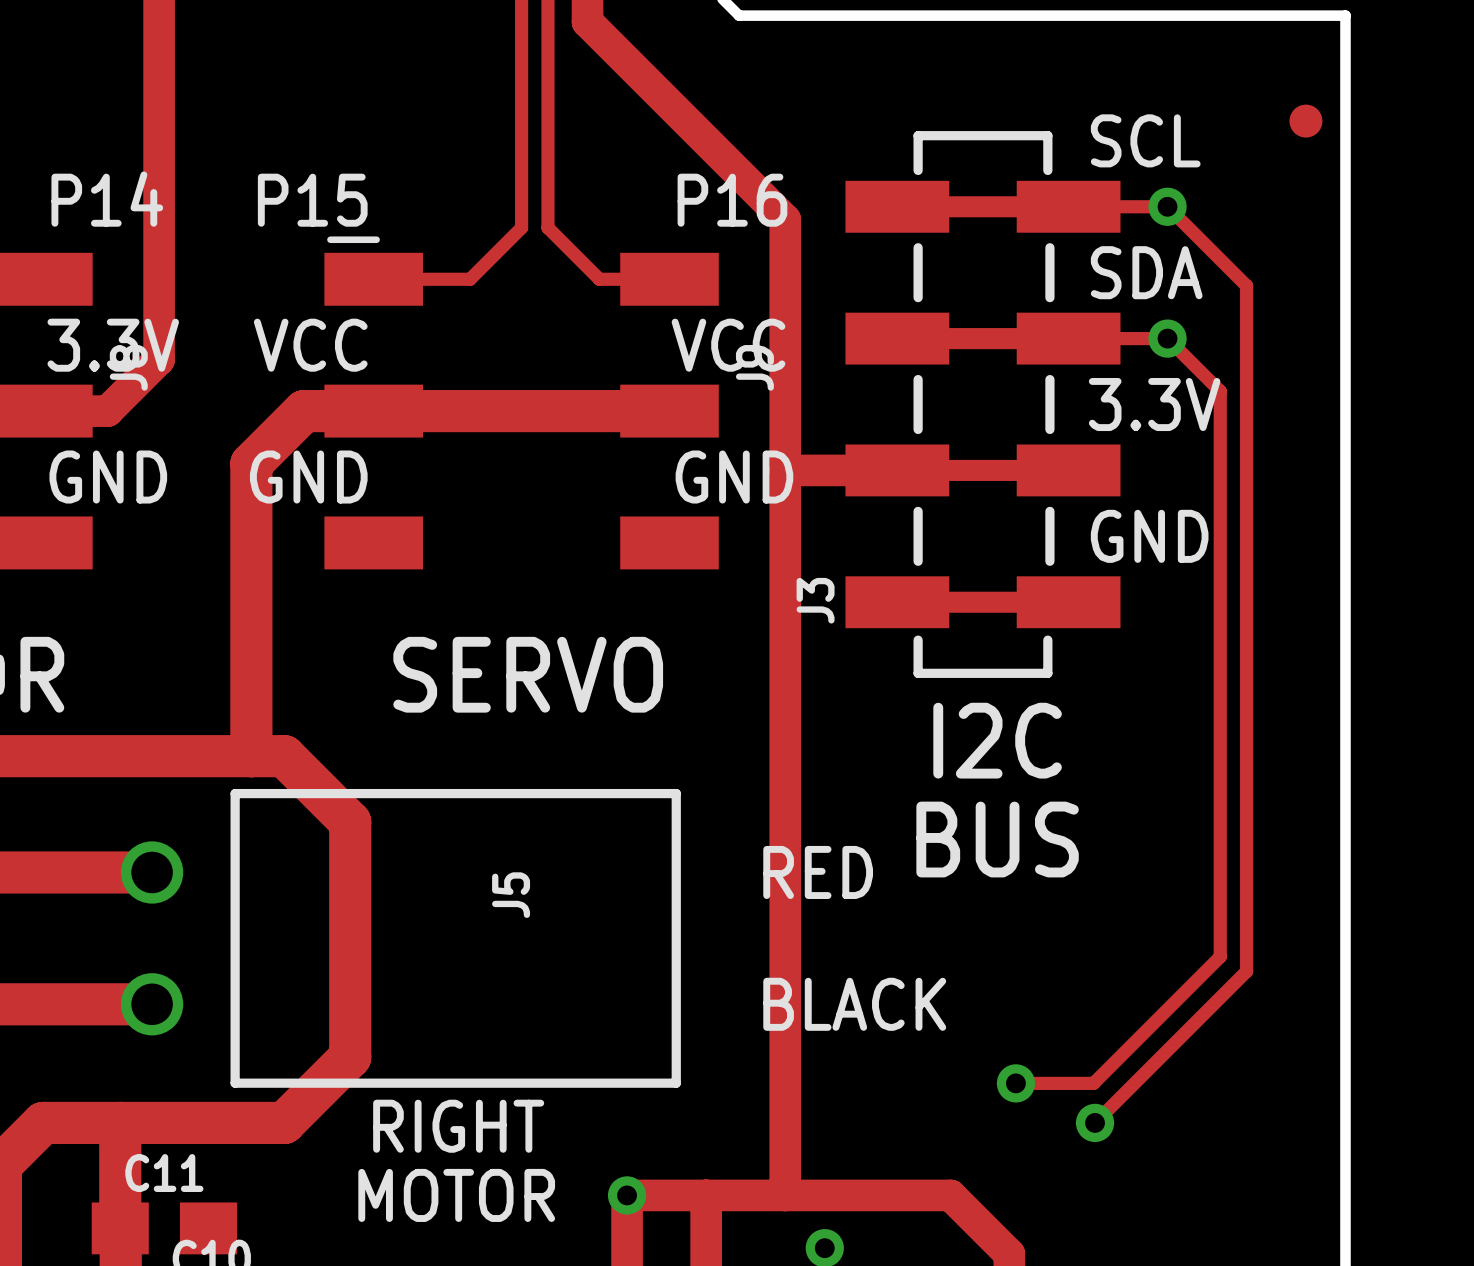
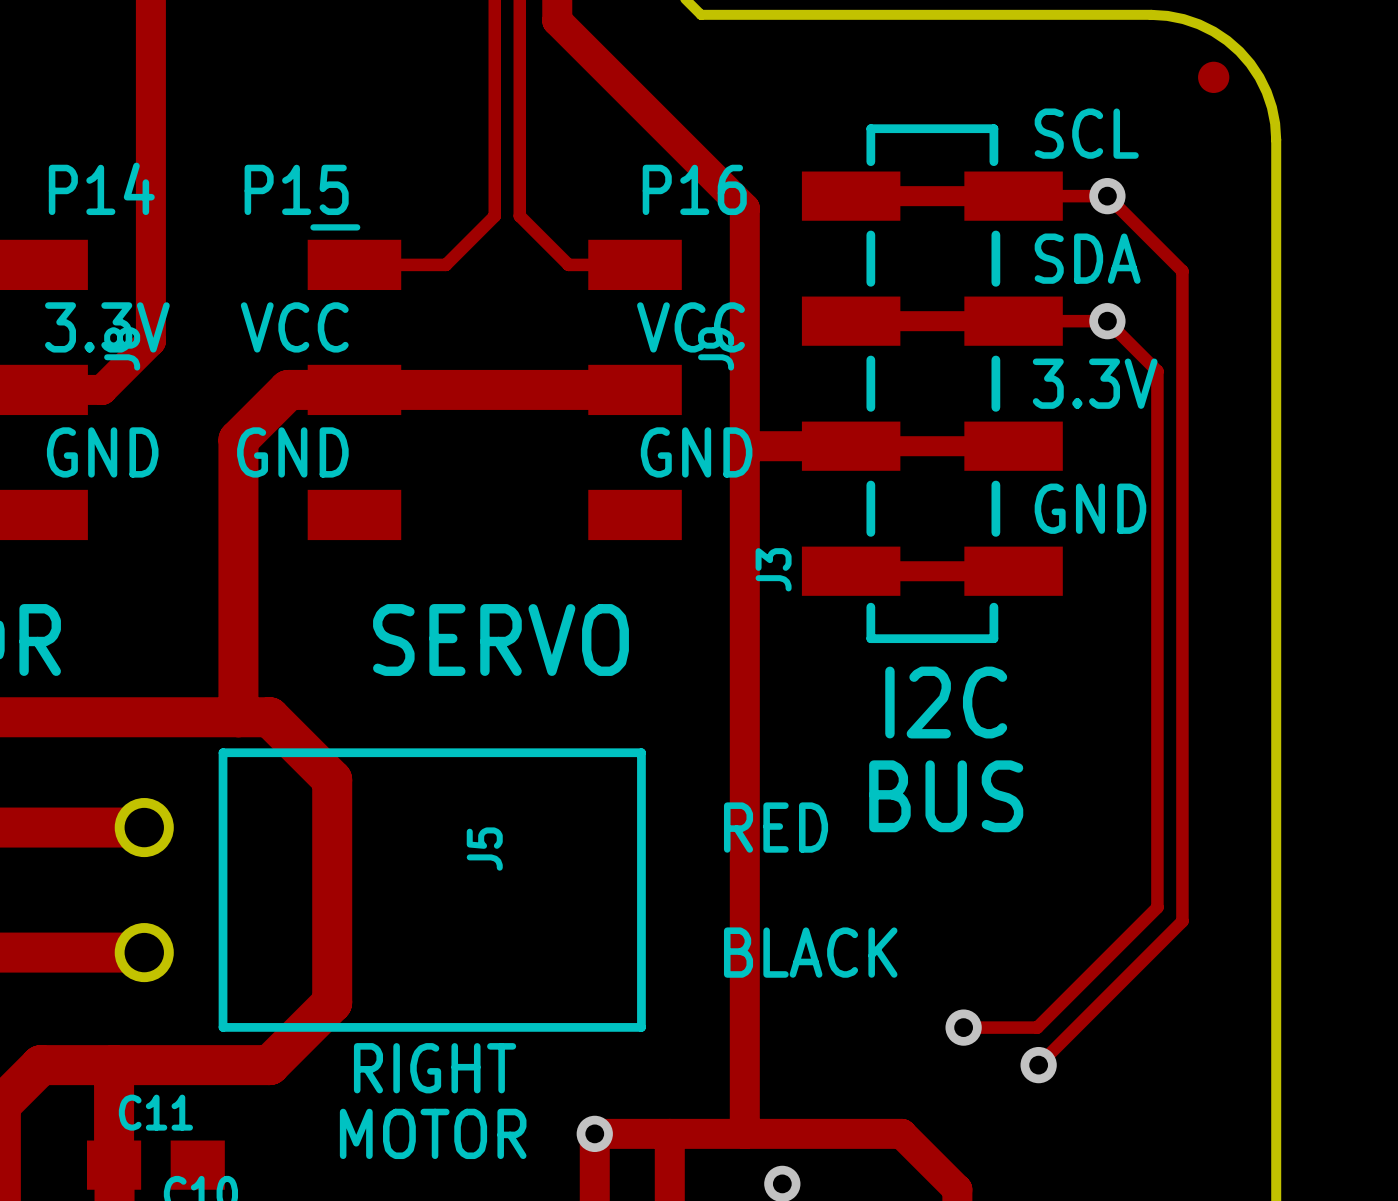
board edge: (1213, 15) (1345, 15) (1345, 147) -> (1151, 14) (1183, 19) (1199, 24) (1227, 40) (1239, 51) (1250, 63) (1266, 92) (1271, 107) (1276, 139)
part position: (1305, 121) -> (1213, 77)

